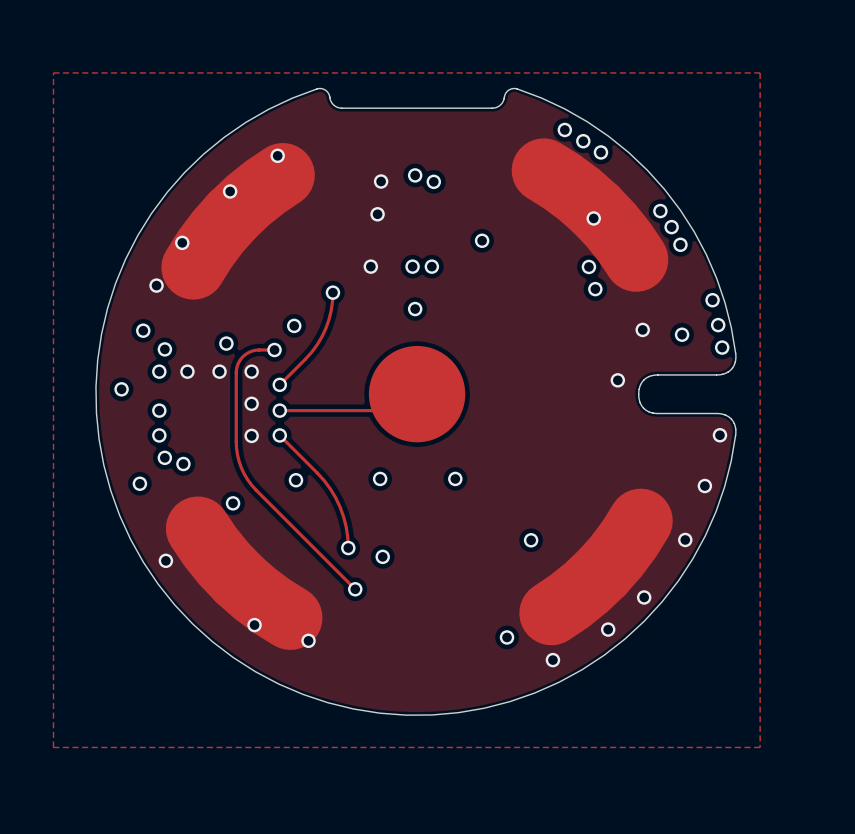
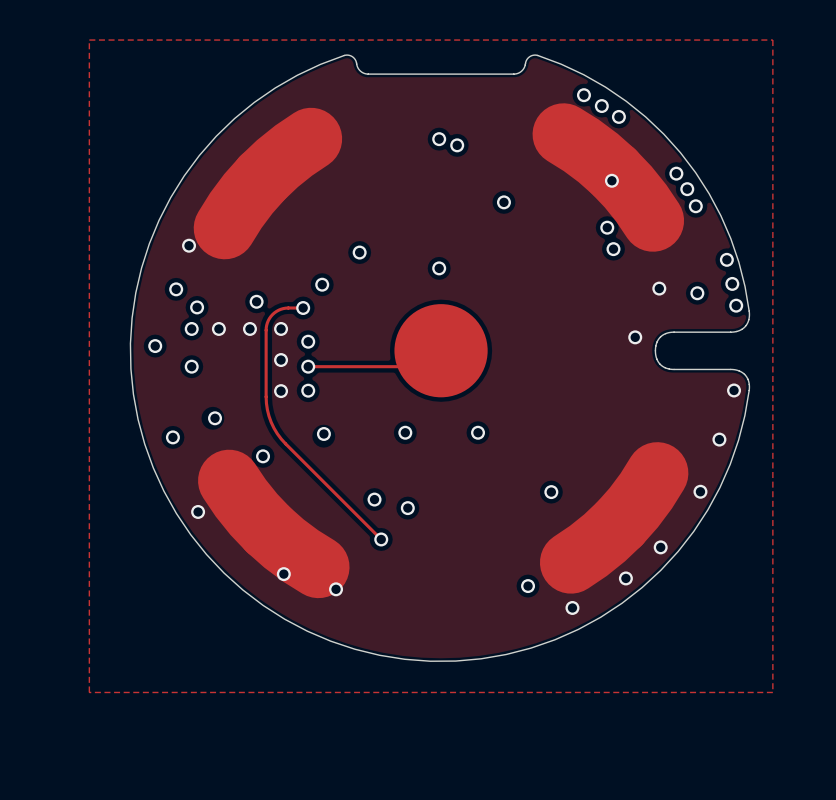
via: (277, 155) -> none
via: (381, 181) -> none
via: (230, 191) -> none
via: (377, 214) -> none
via: (182, 242) -> none
via: (370, 266) -> none
via: (412, 266) -> none
via: (431, 266) -> none
track: (332, 292) (331, 311) (321, 337) (311, 352) (279, 384) -> none
via: (159, 435) -> none
track: (279, 435) (330, 488) (343, 517) (348, 548) -> none
via: (164, 457) -> none

